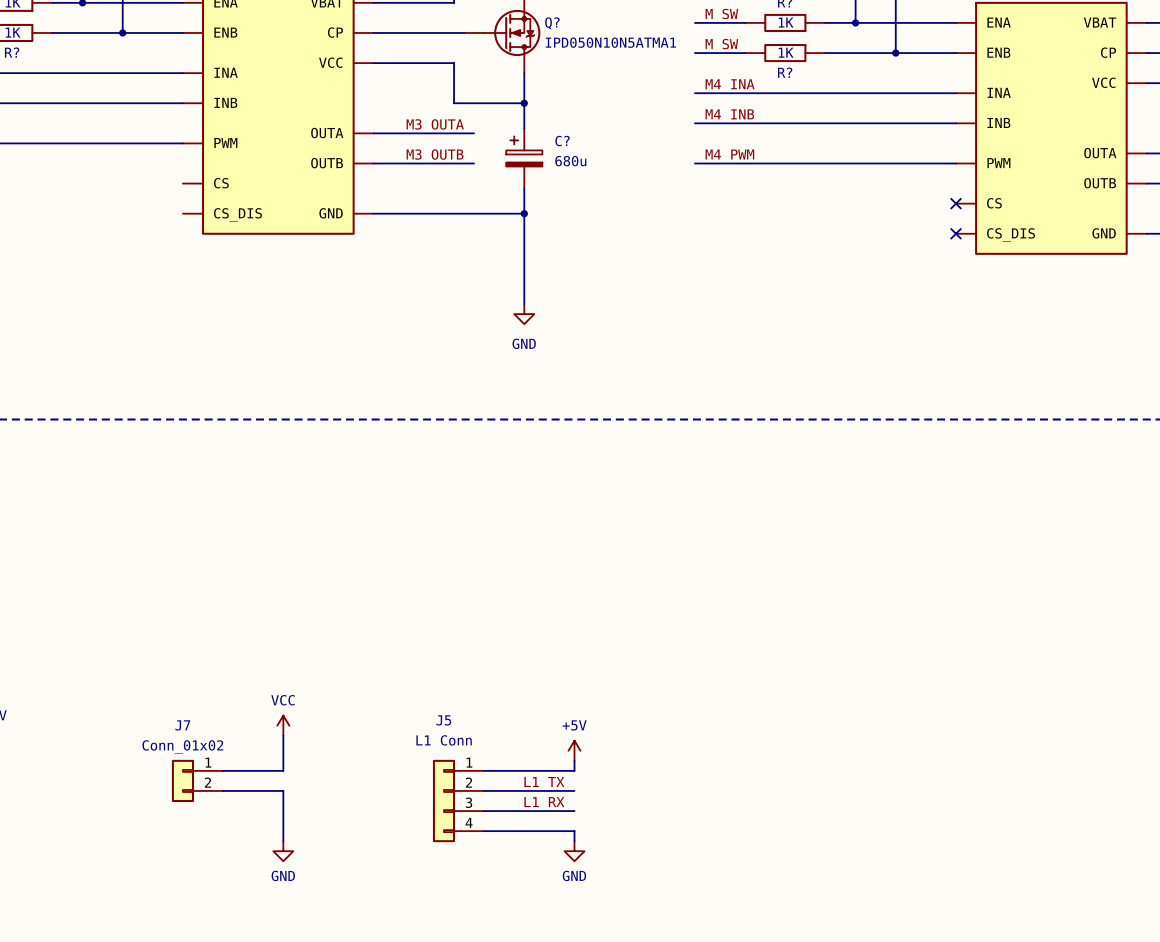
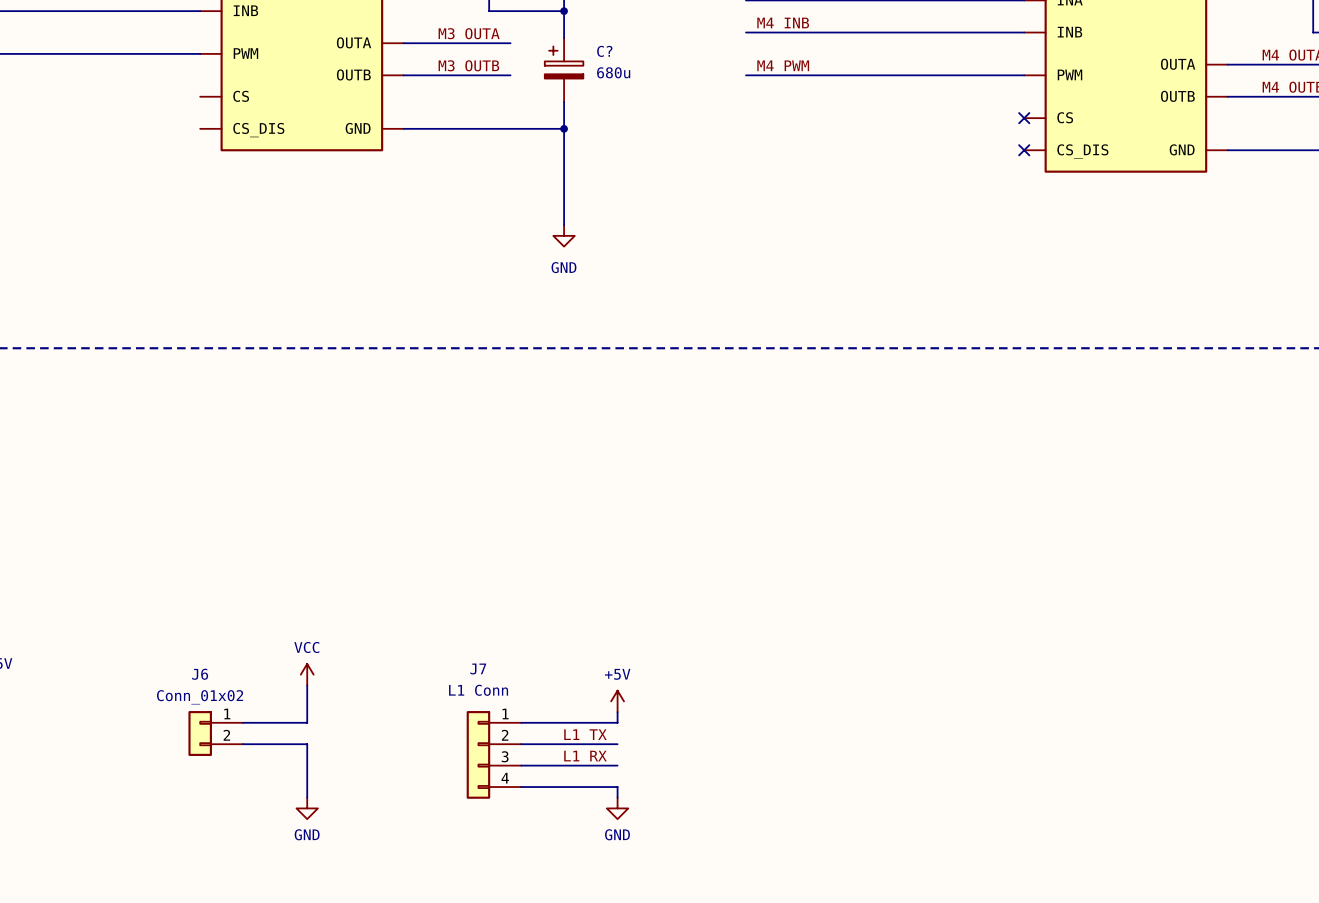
J5 name: J5 (443, 720) -> J7 (478, 669)
J7 name: J7 (182, 725) -> J6 (200, 674)

